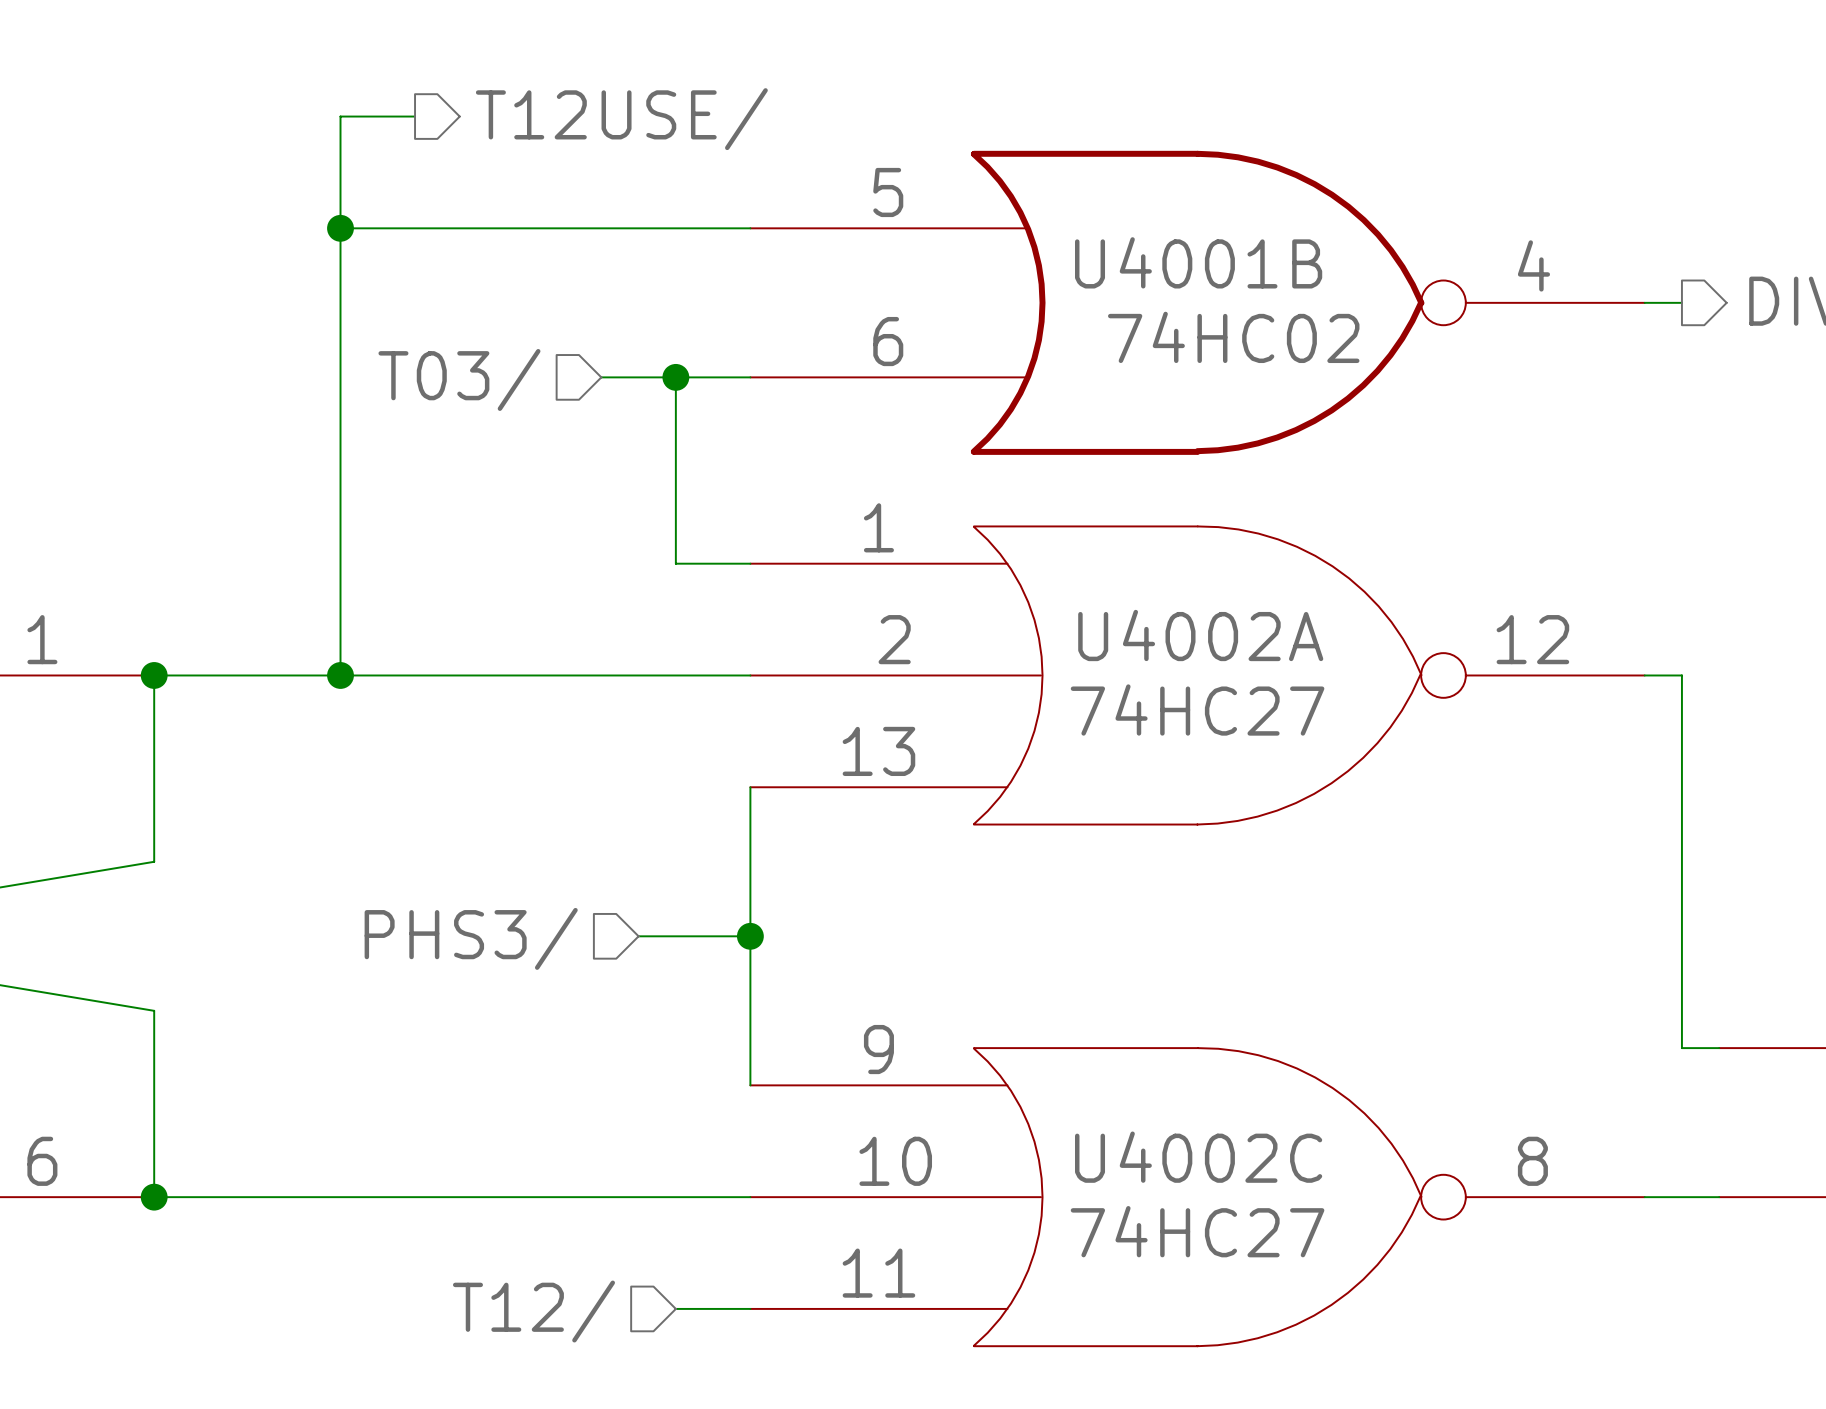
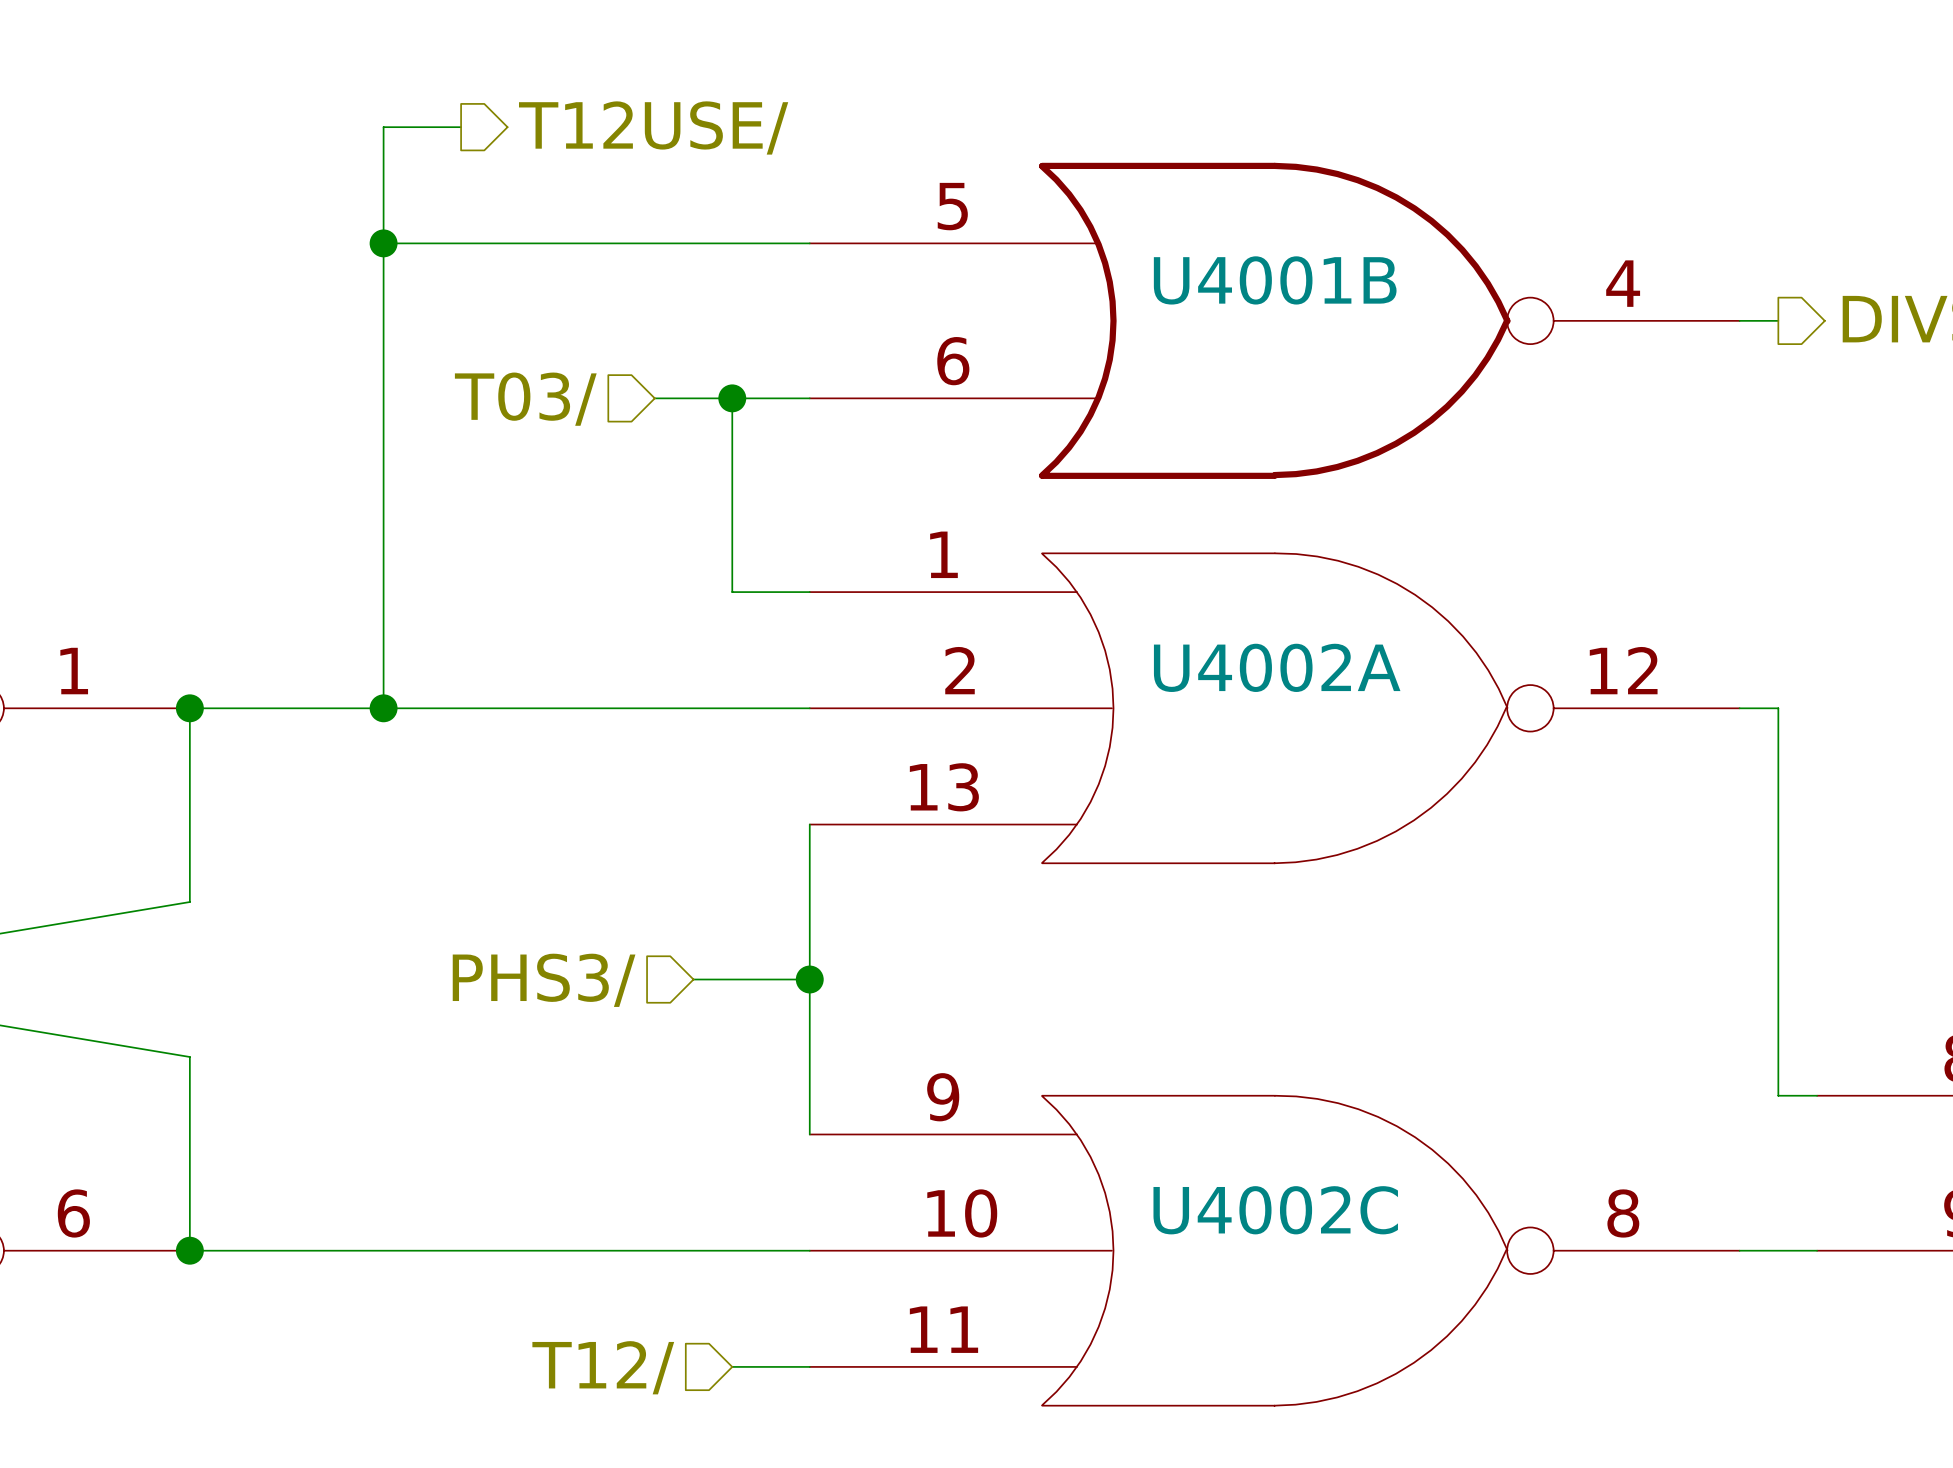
U4001B value: 74HC02 (1233, 337) -> none
U4002A value: 74HC27 (1197, 710) -> none
U4002C value: 74HC27 (1197, 1231) -> none

